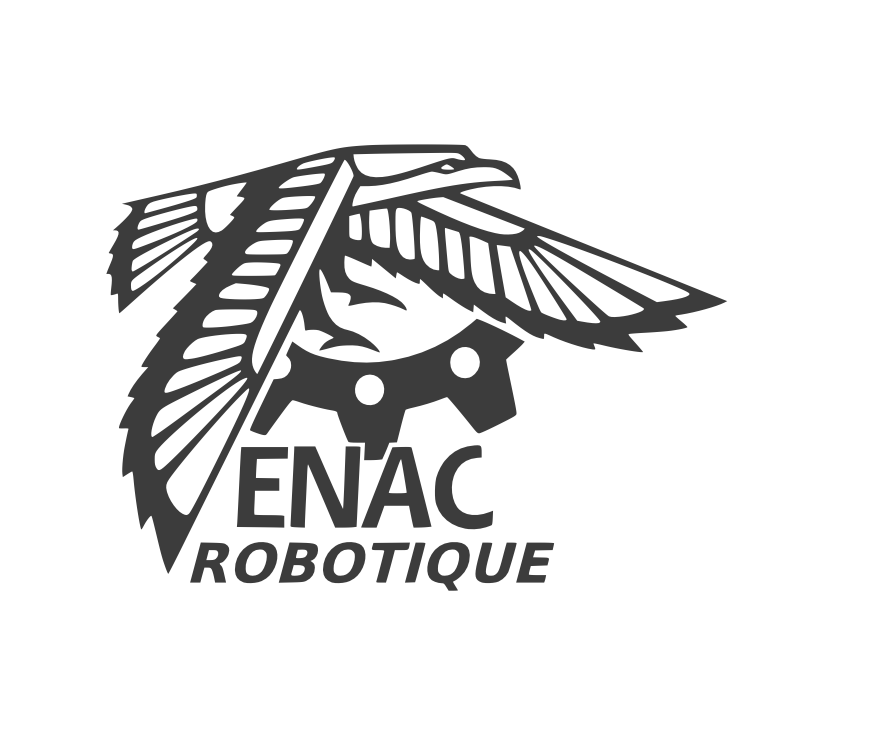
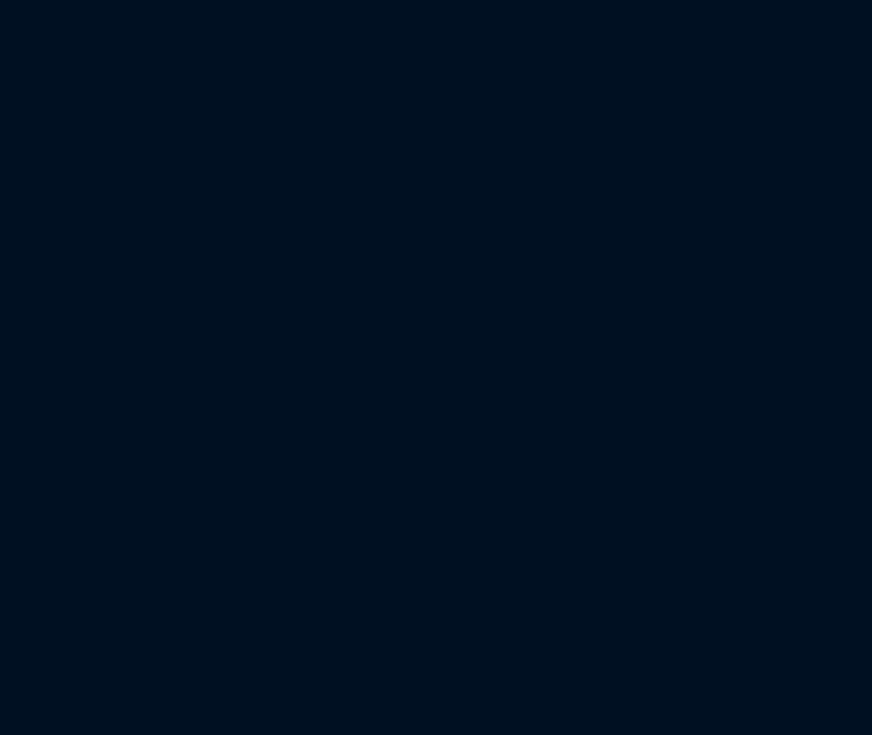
drawing: [106, 144, 728, 591] -> none

